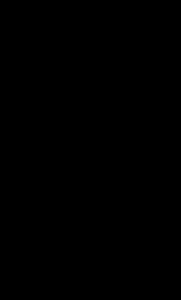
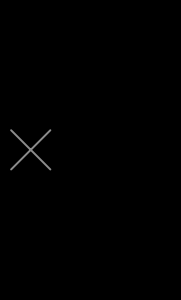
no-connect mark: none -> (30, 149)

